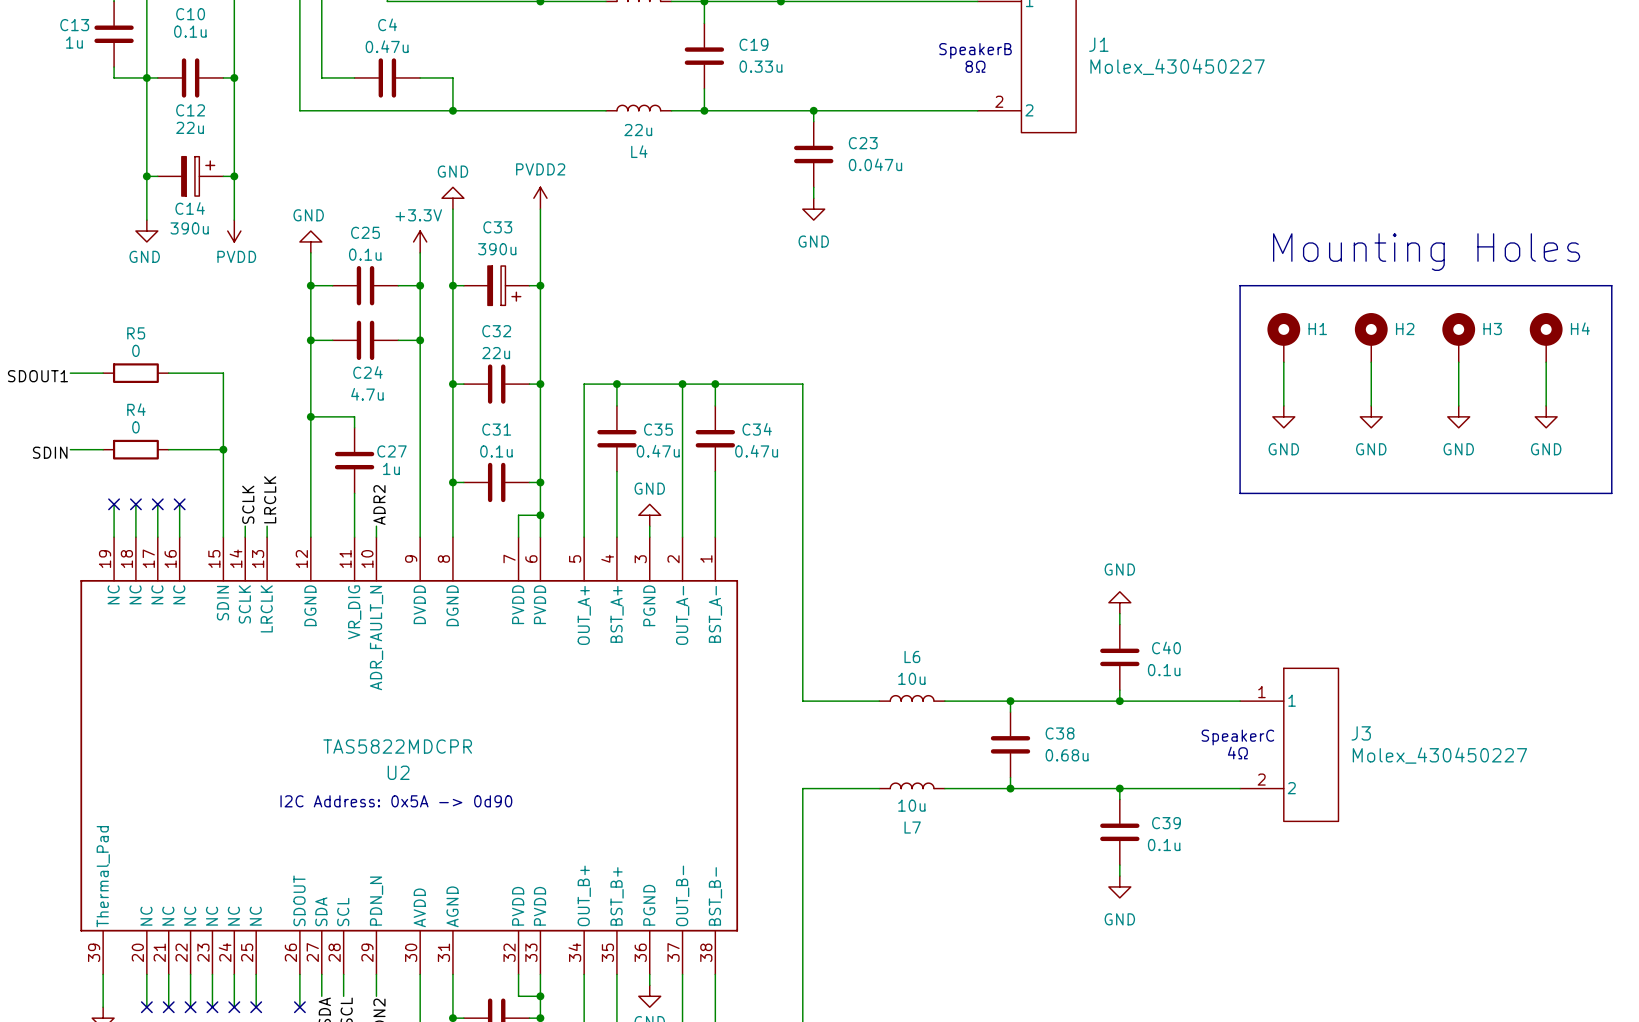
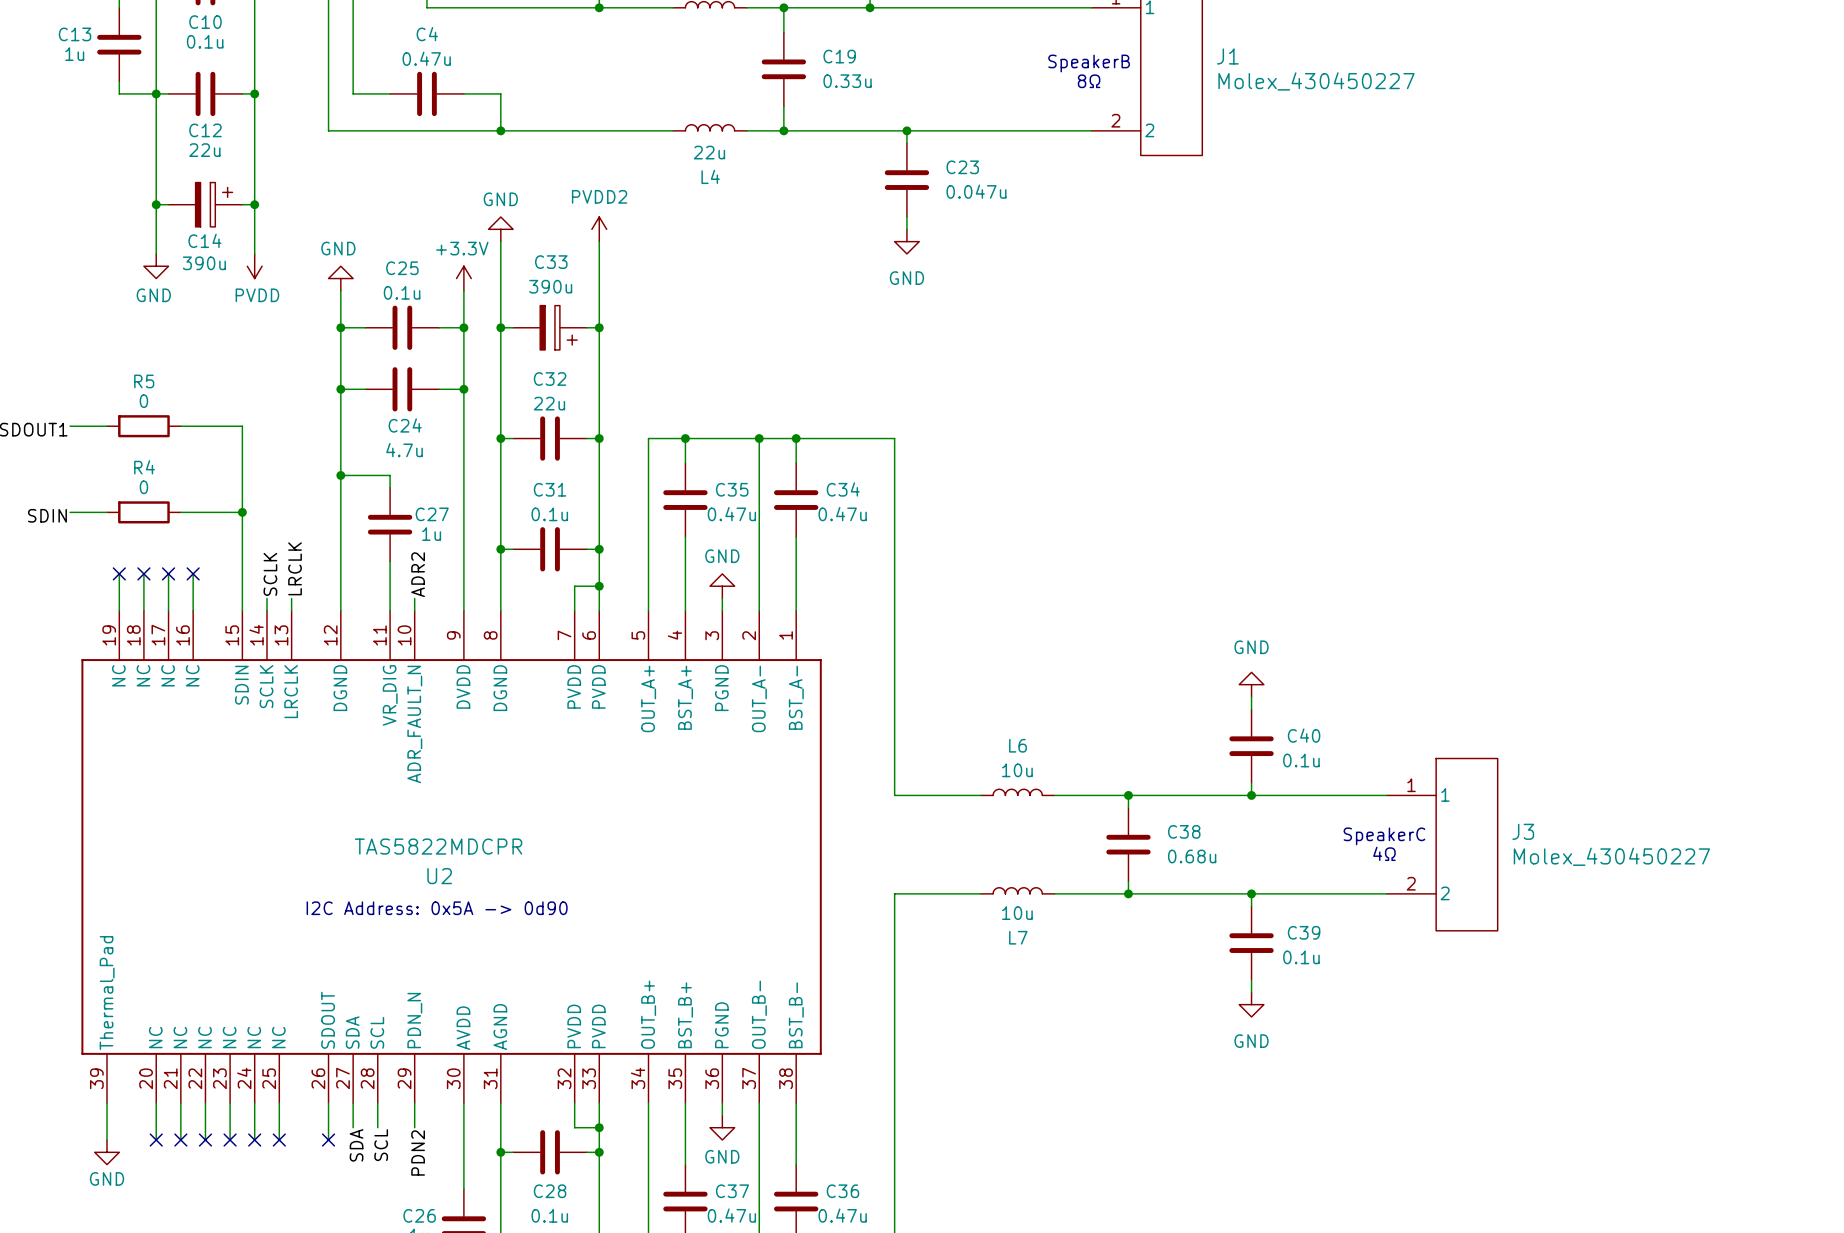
text: Mounting Holes (1426, 252) -> none
line: (1240, 285) (1611, 285) (1611, 493) (1240, 493) (1240, 285) -> none
H1: (1283, 337) -> none
H2: (1371, 337) -> none
H3: (1458, 337) -> none
H4: (1546, 337) -> none
wire: (1283, 362) (1283, 405) -> none
wire: (1371, 362) (1371, 405) -> none
wire: (1458, 362) (1458, 405) -> none
wire: (1546, 362) (1546, 405) -> none
power symbol: GND (1283, 416) -> none
power symbol: GND (1371, 416) -> none
power symbol: GND (1458, 416) -> none
power symbol: GND (1546, 416) -> none

